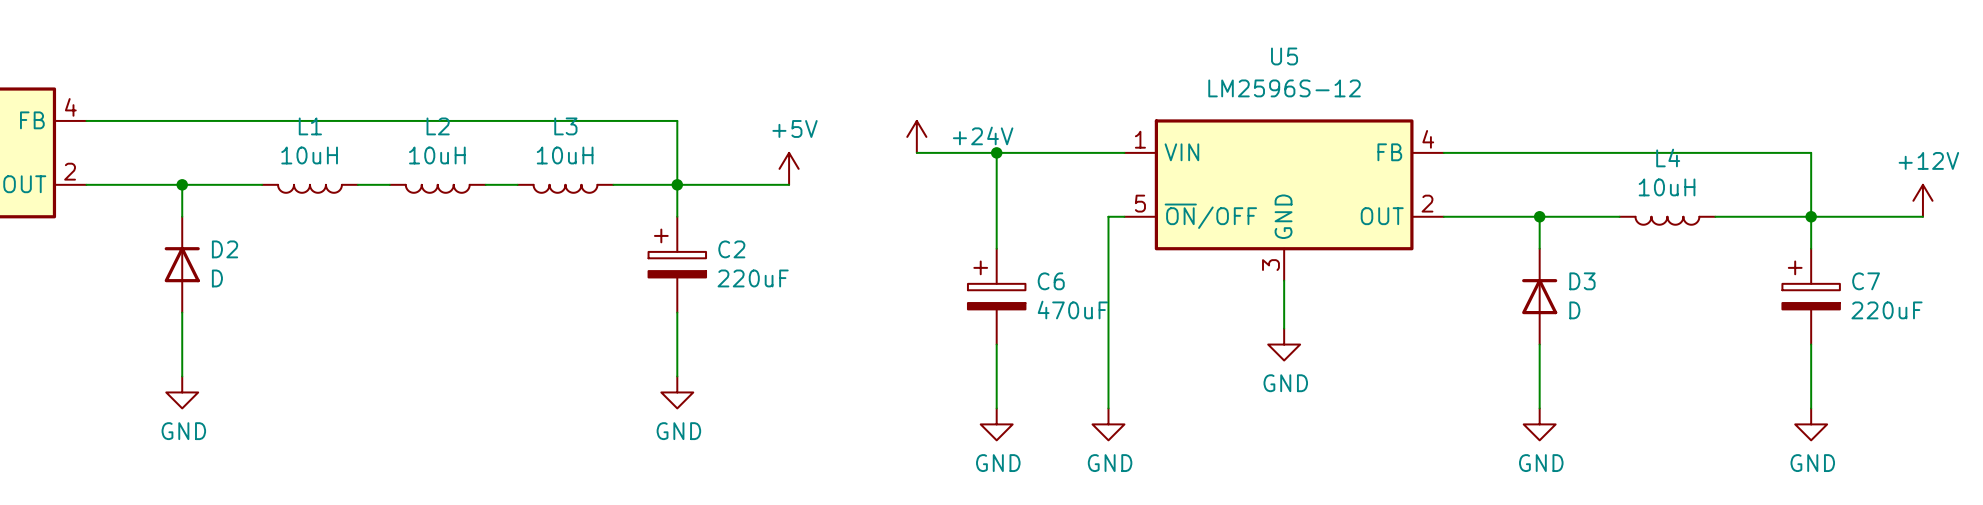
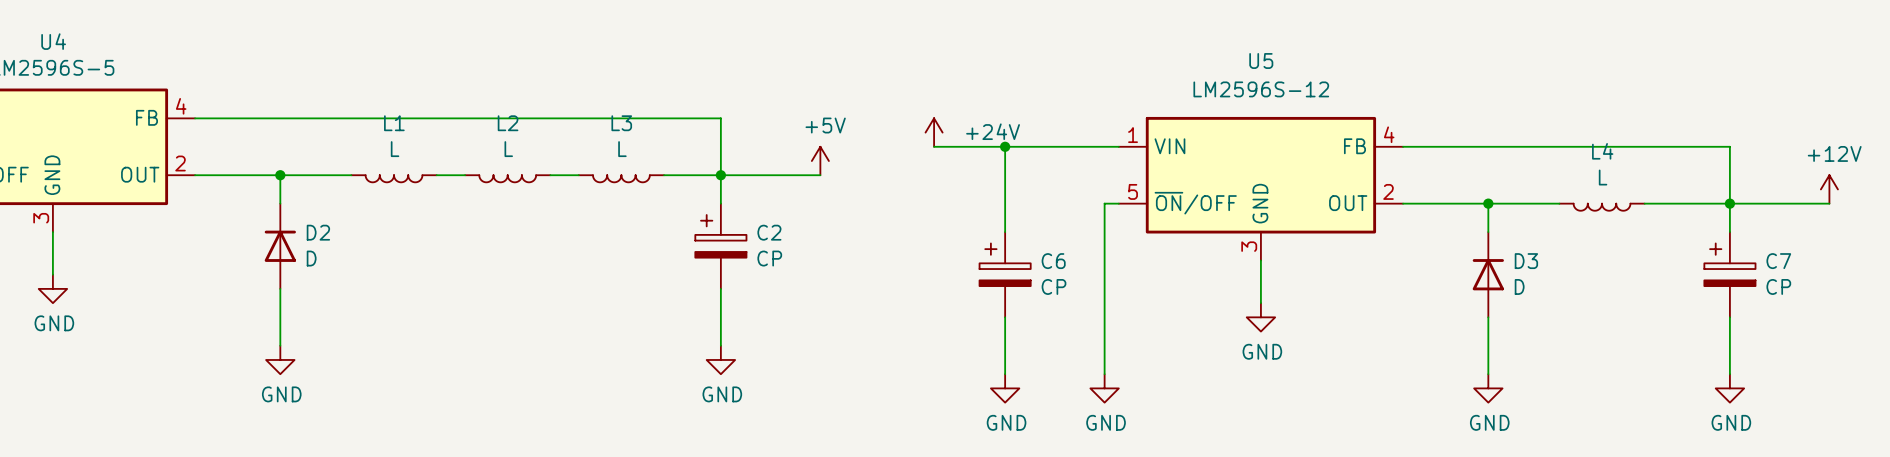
L1 value: 10uH (309, 155) -> L (395, 149)
L2 value: 10uH (437, 155) -> L (508, 149)
L3 value: 10uH (565, 155) -> L (622, 149)
L4 value: 10uH (1667, 187) -> L (1603, 177)
C2 value: 220uF (753, 278) -> CP (769, 258)
C6 value: 470uF (1072, 310) -> CP (1054, 286)
C7 value: 220uF (1886, 310) -> CP (1778, 286)

